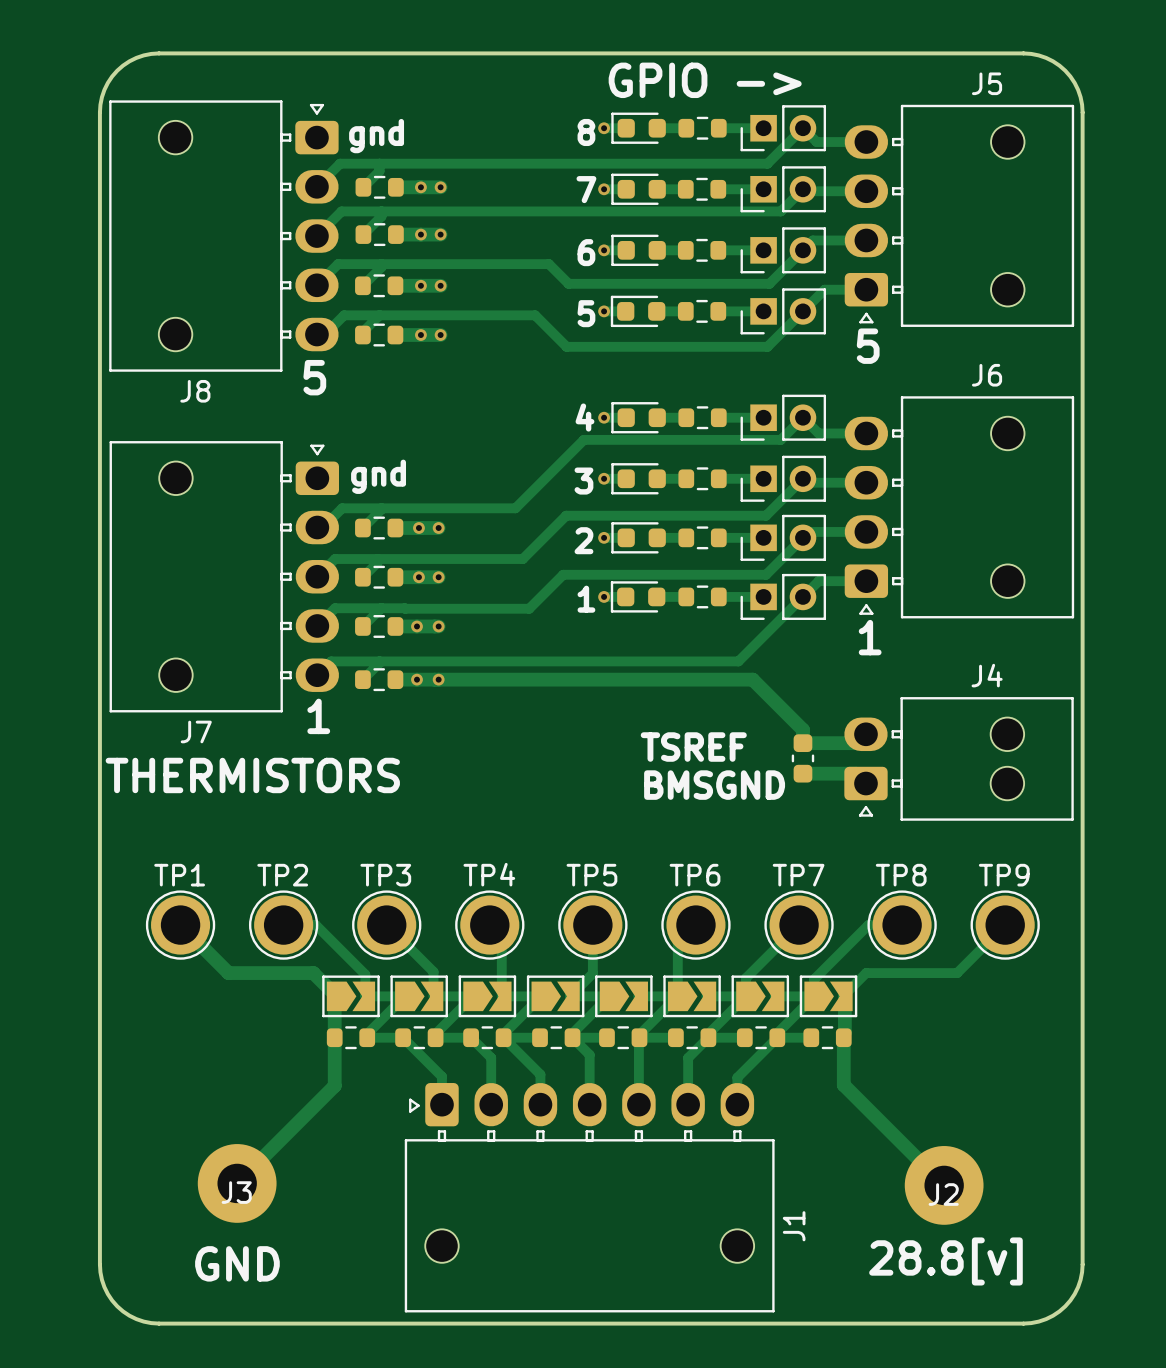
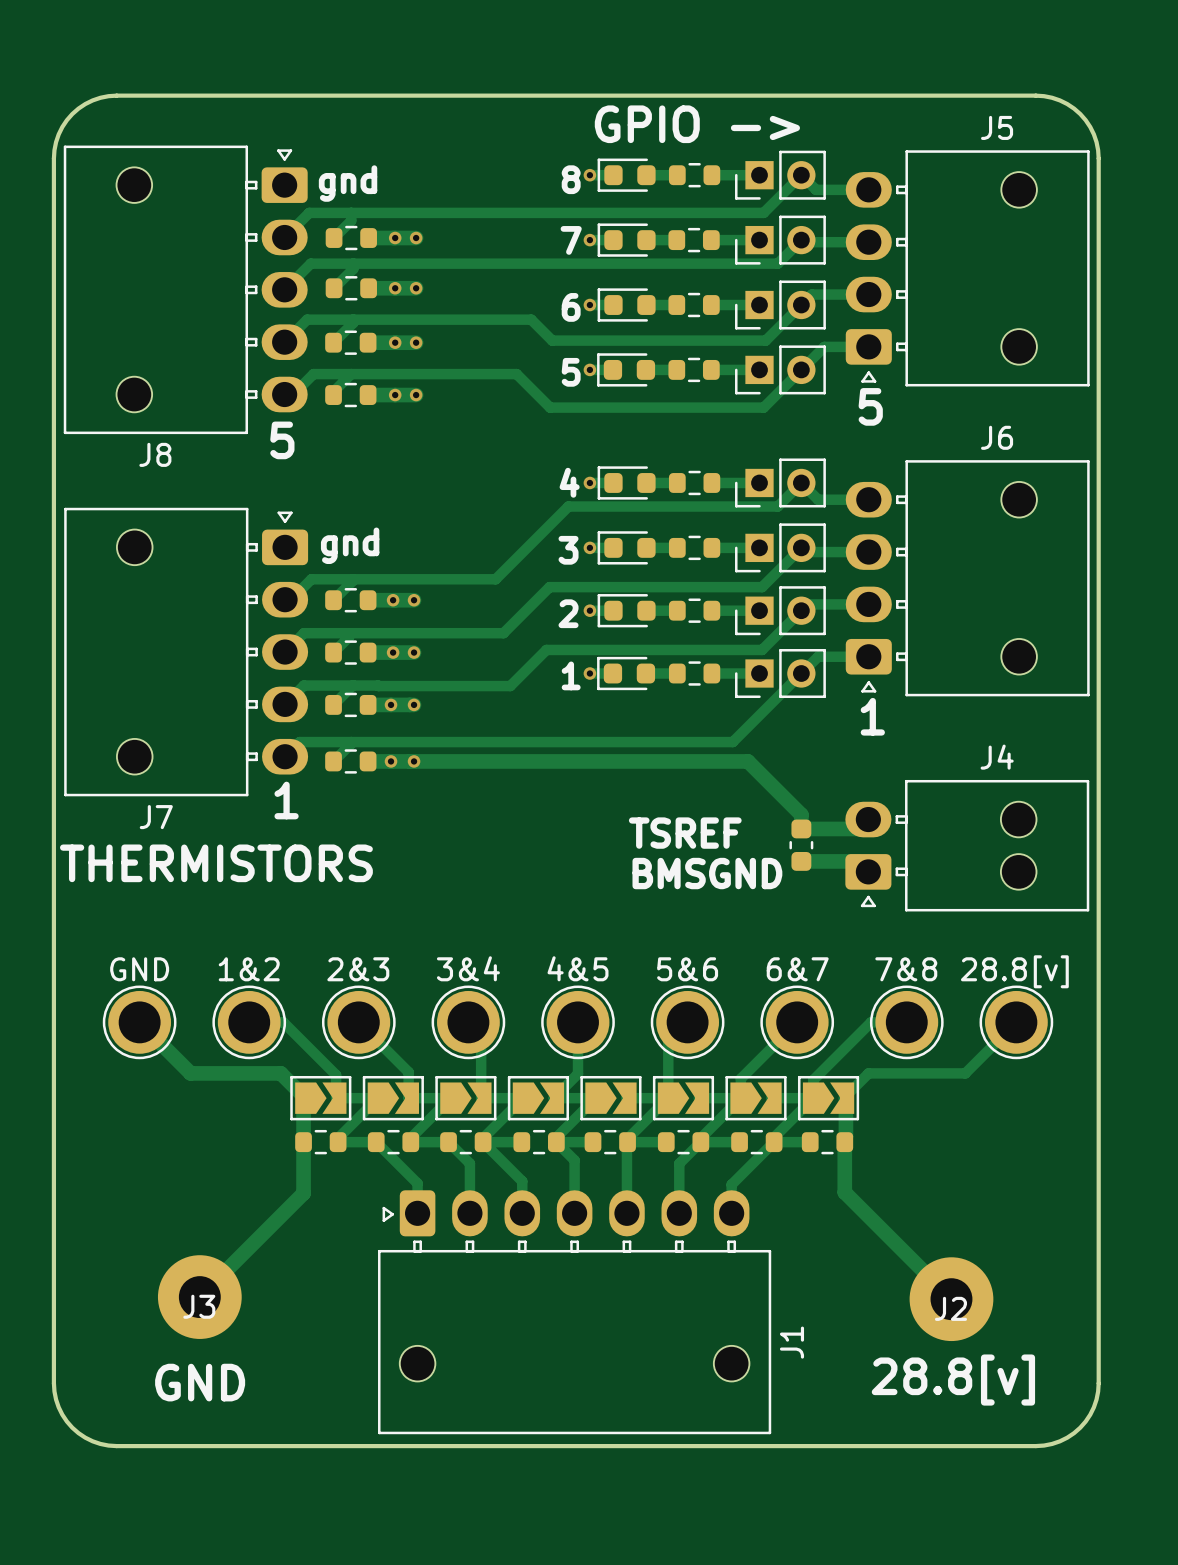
TP4 name: TP4 (489, 874) -> 3&4 (468, 968)
TP1 name: TP1 (179, 875) -> GND (139, 969)
TP2 name: TP2 (282, 875) -> 1&2 (249, 969)
TP3 name: TP3 (385, 875) -> 2&3 (358, 969)
TP5 name: TP5 (591, 875) -> 4&5 (578, 968)
TP6 name: TP6 (695, 875) -> 5&6 (687, 969)
TP7 name: TP7 (798, 875) -> 6&7 (797, 969)
TP8 name: TP8 (901, 875) -> 7&8 (906, 969)
TP9 name: TP9 (1004, 875) -> 28.8[v] (1014, 971)

